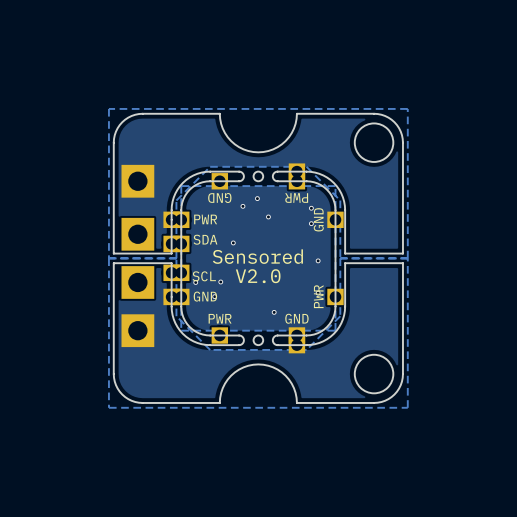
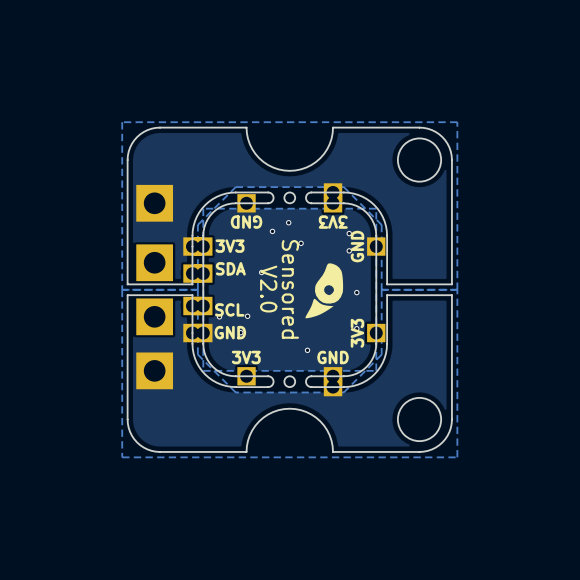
part value: PWR (296, 198) -> 3V3 (333, 222)
part value: PWR (205, 219) -> 3V3 (230, 246)
drawing: none -> [305, 263, 344, 319]
text rotation: 0° (257, 256) -> 90° clockwise (290, 289)
text rotation: 0° (258, 276) -> 90° clockwise (268, 289)
part value: PWR (318, 296) -> 3V3 (357, 333)
part value: PWR (220, 318) -> 3V3 (246, 357)

